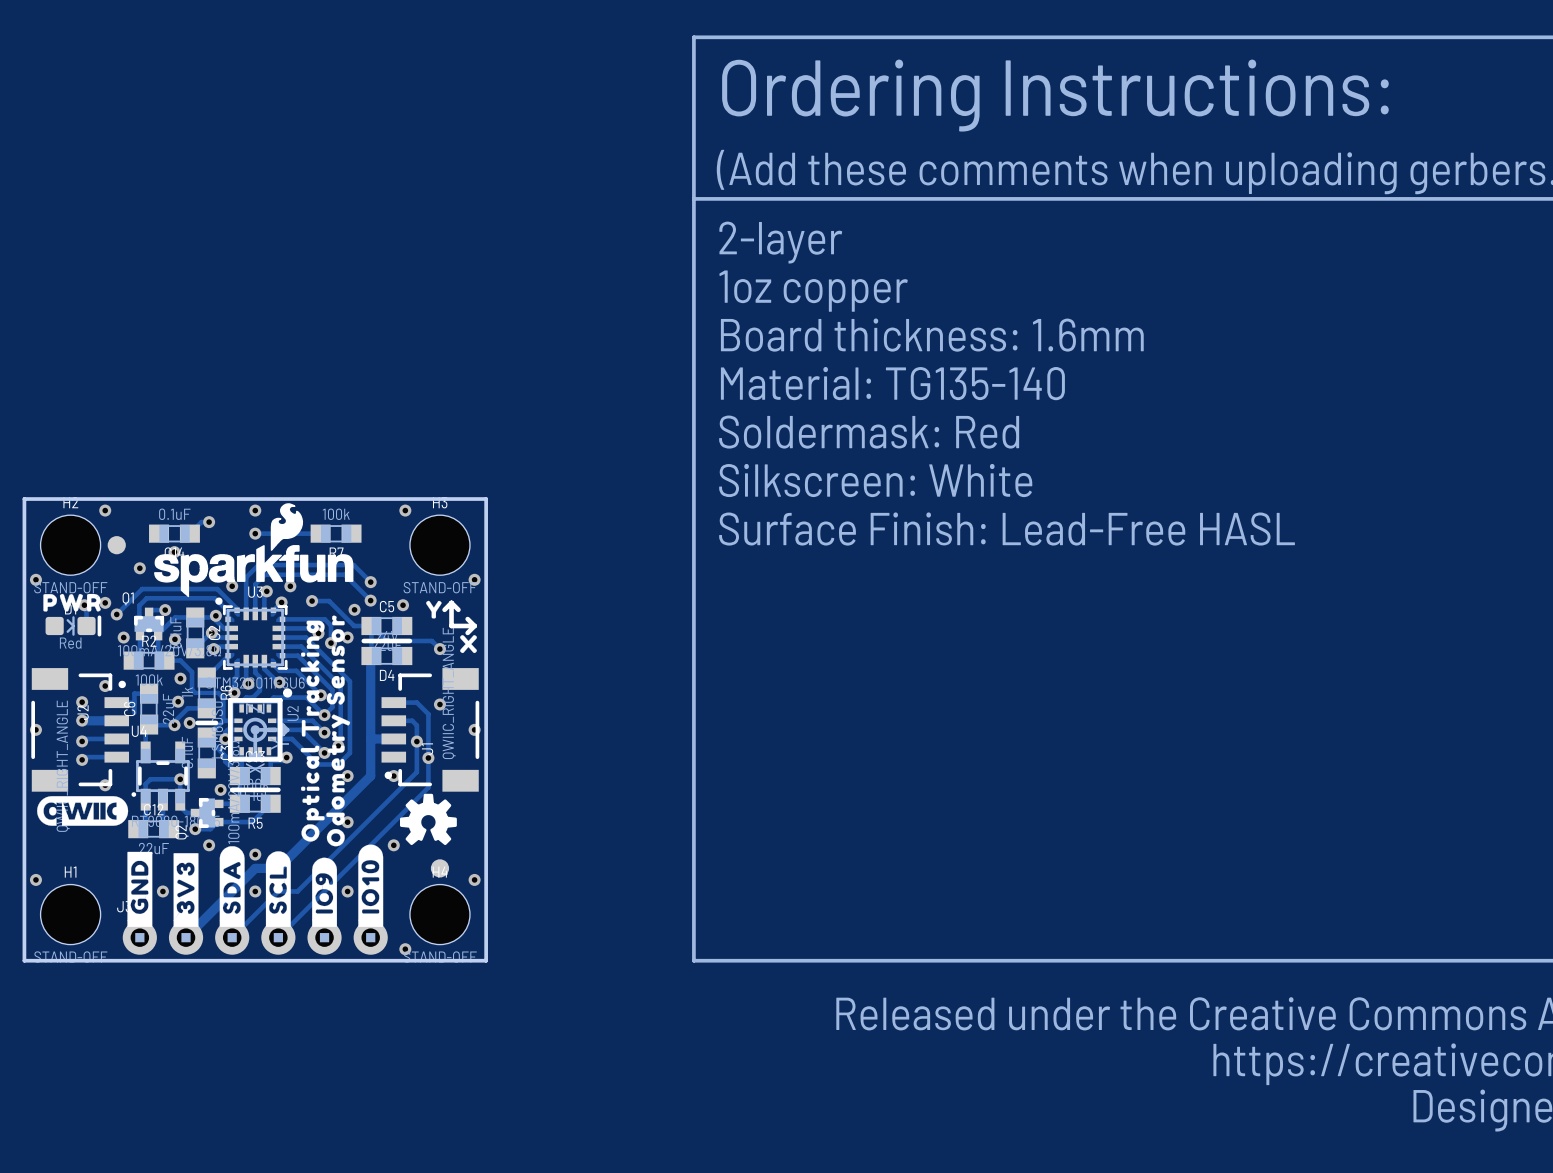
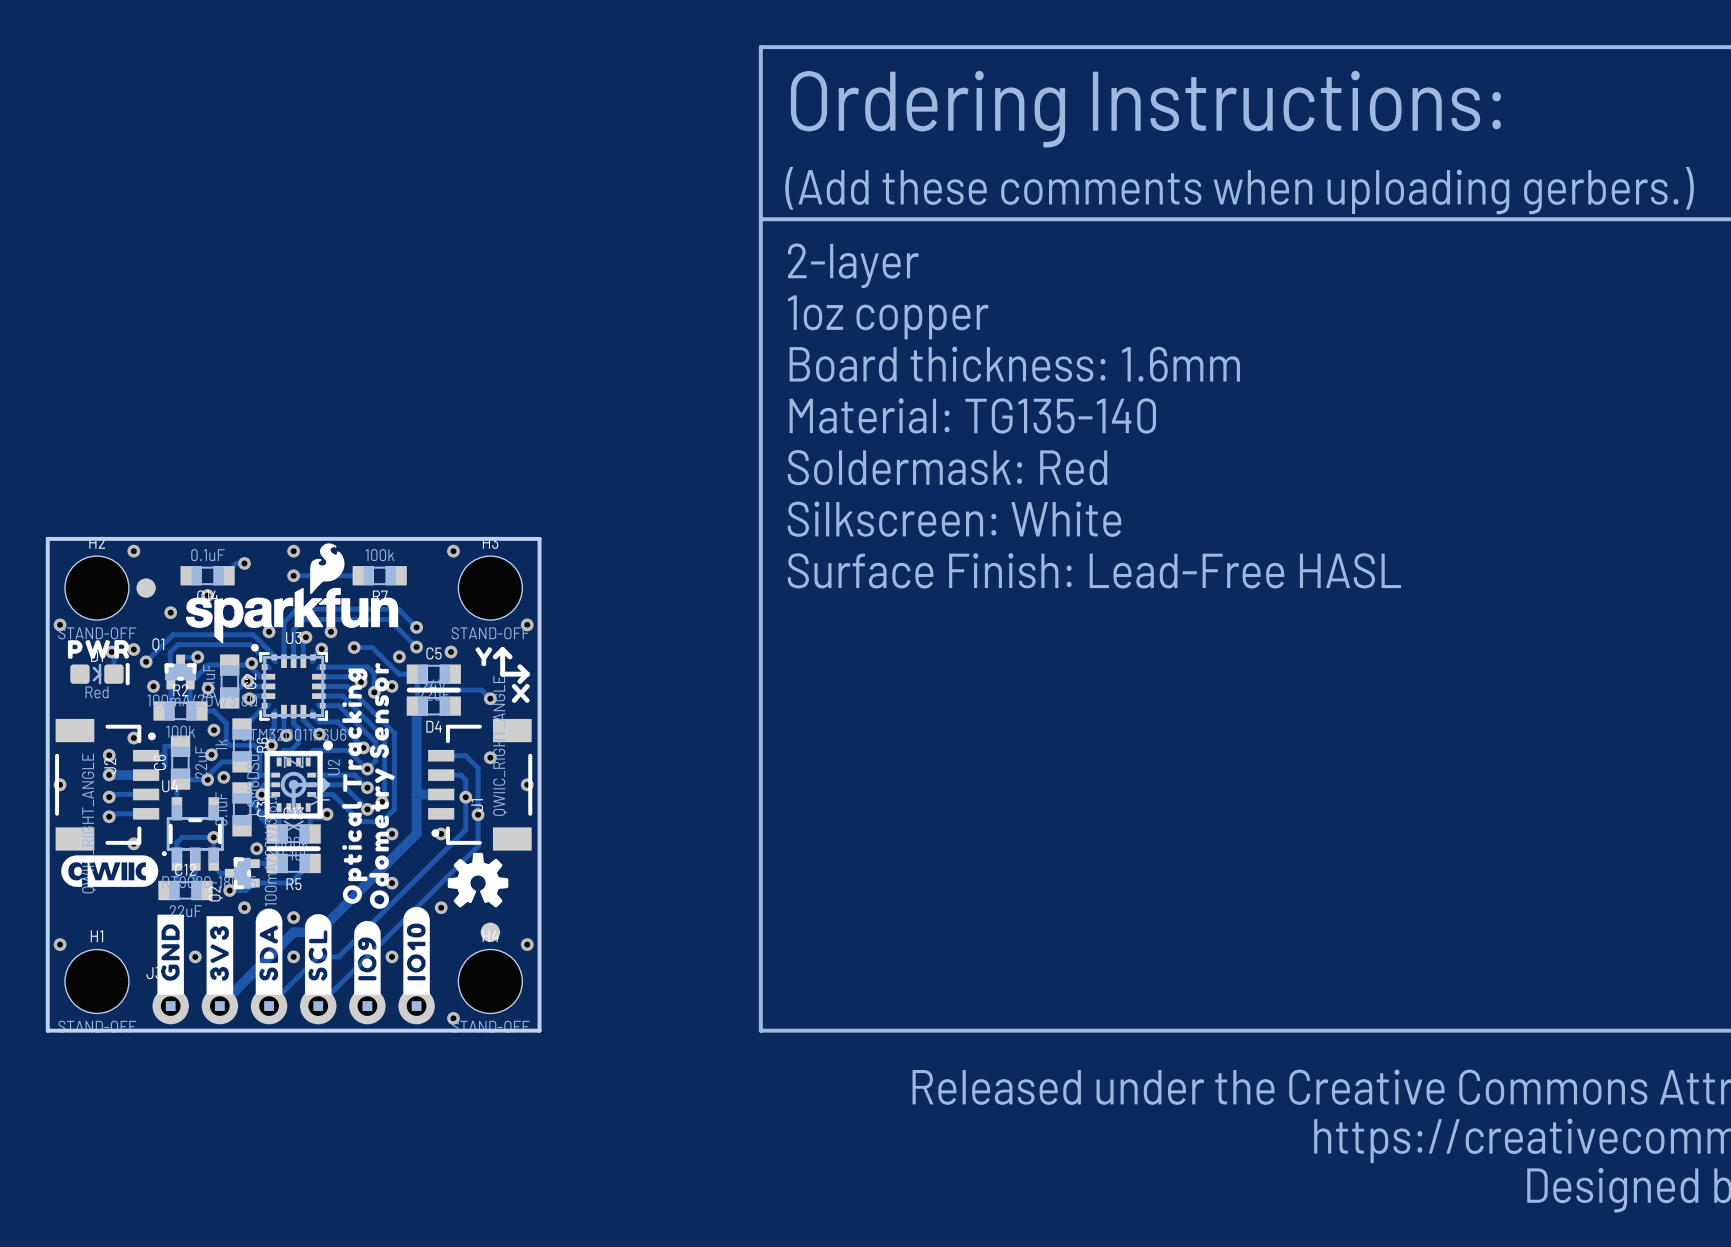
line: (197, 722) (216, 722) -> none

